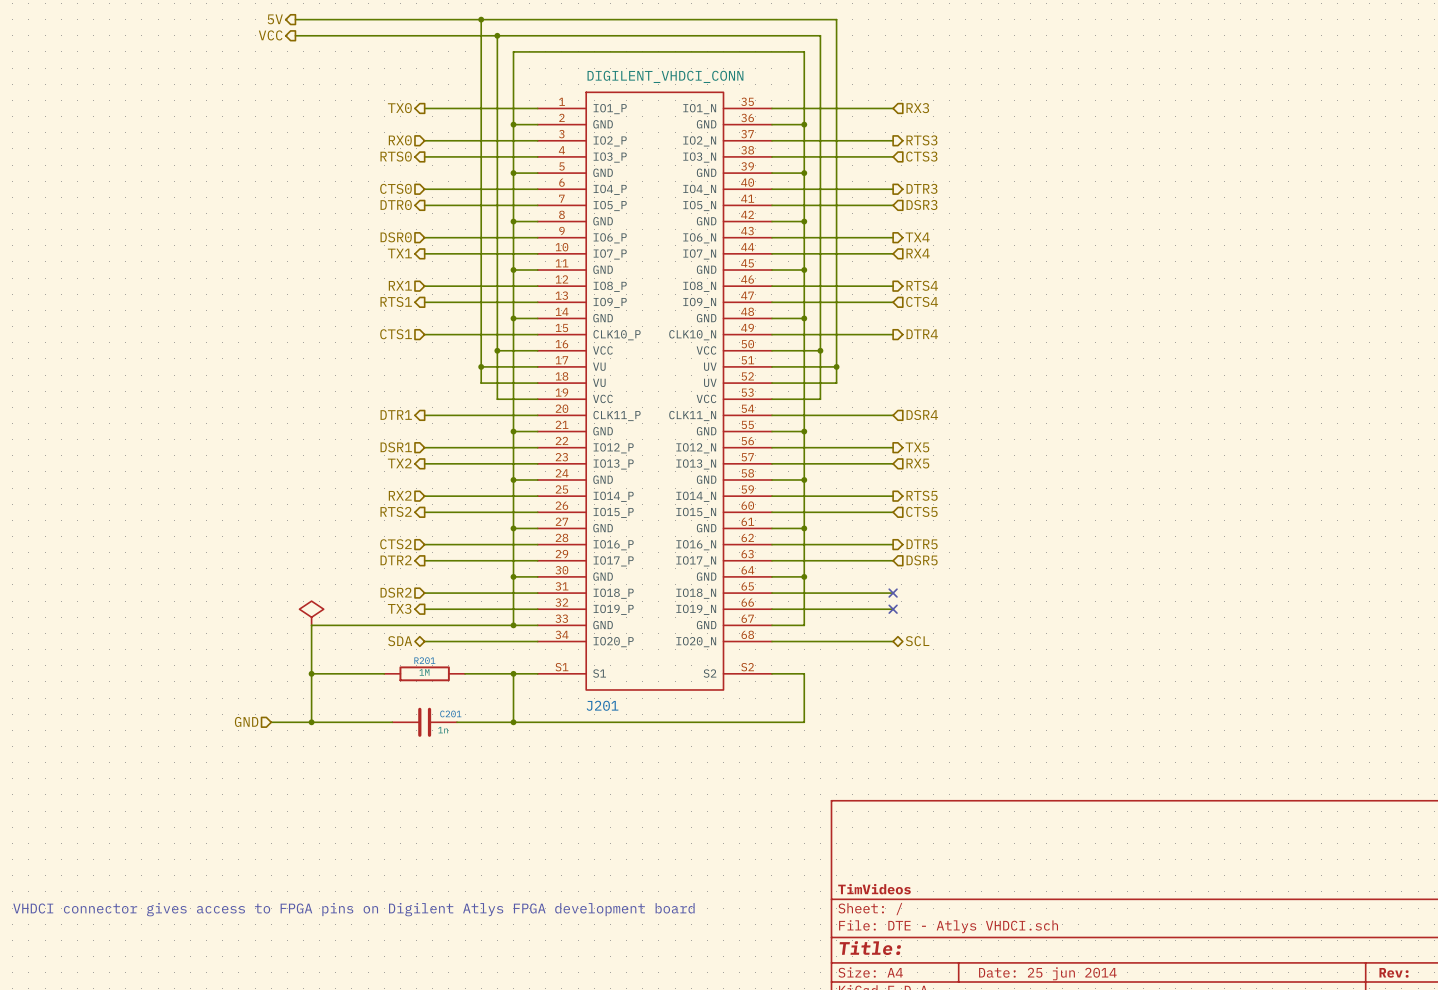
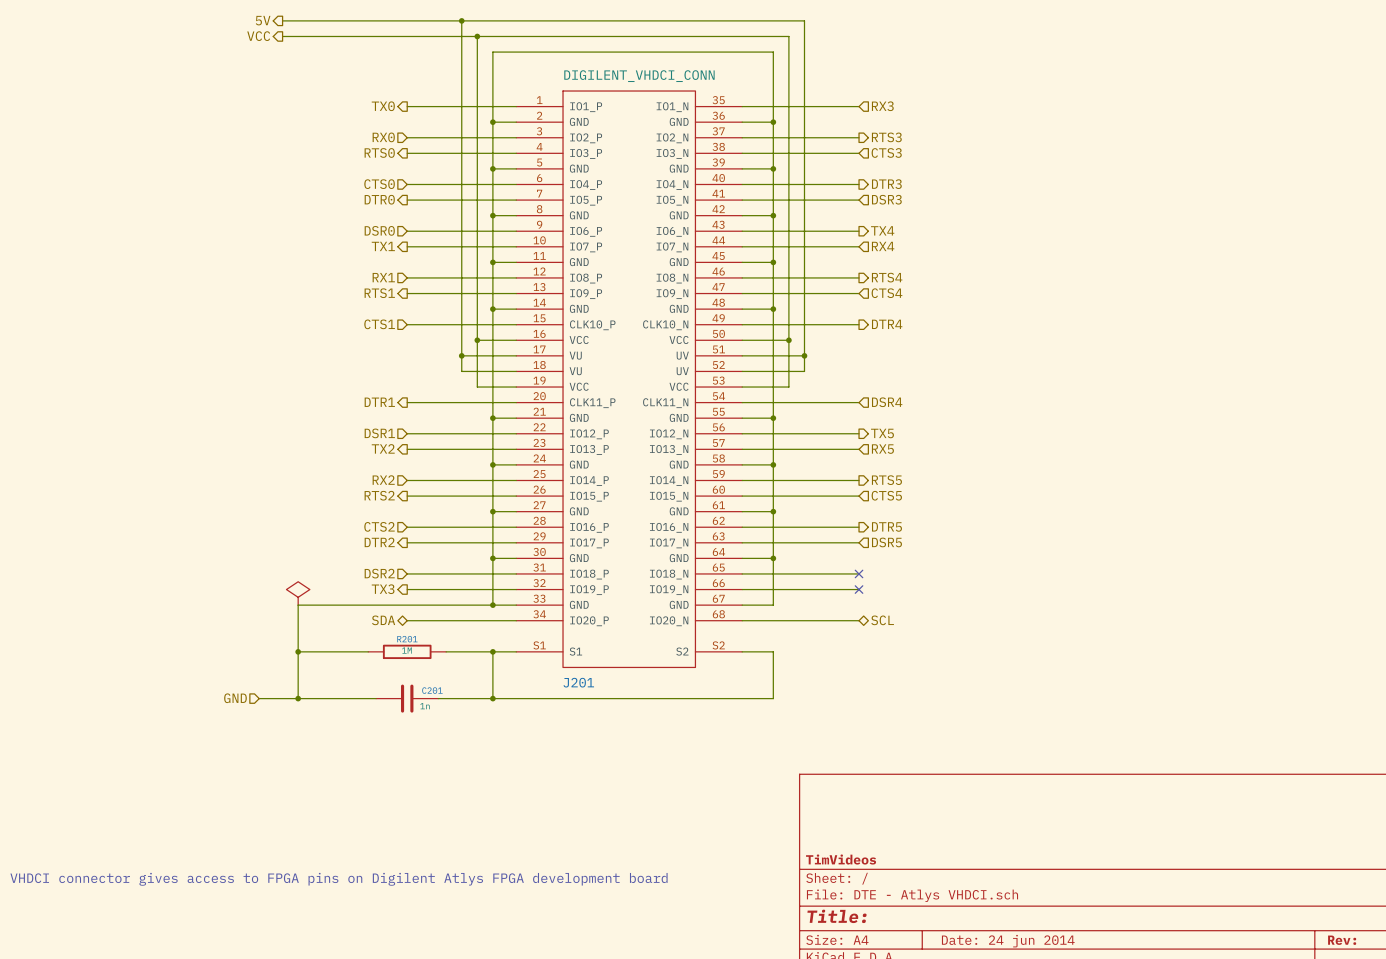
title block: Date: 25 jun 2014 (1047, 973) -> Date: 24 jun 2014 (1008, 941)

